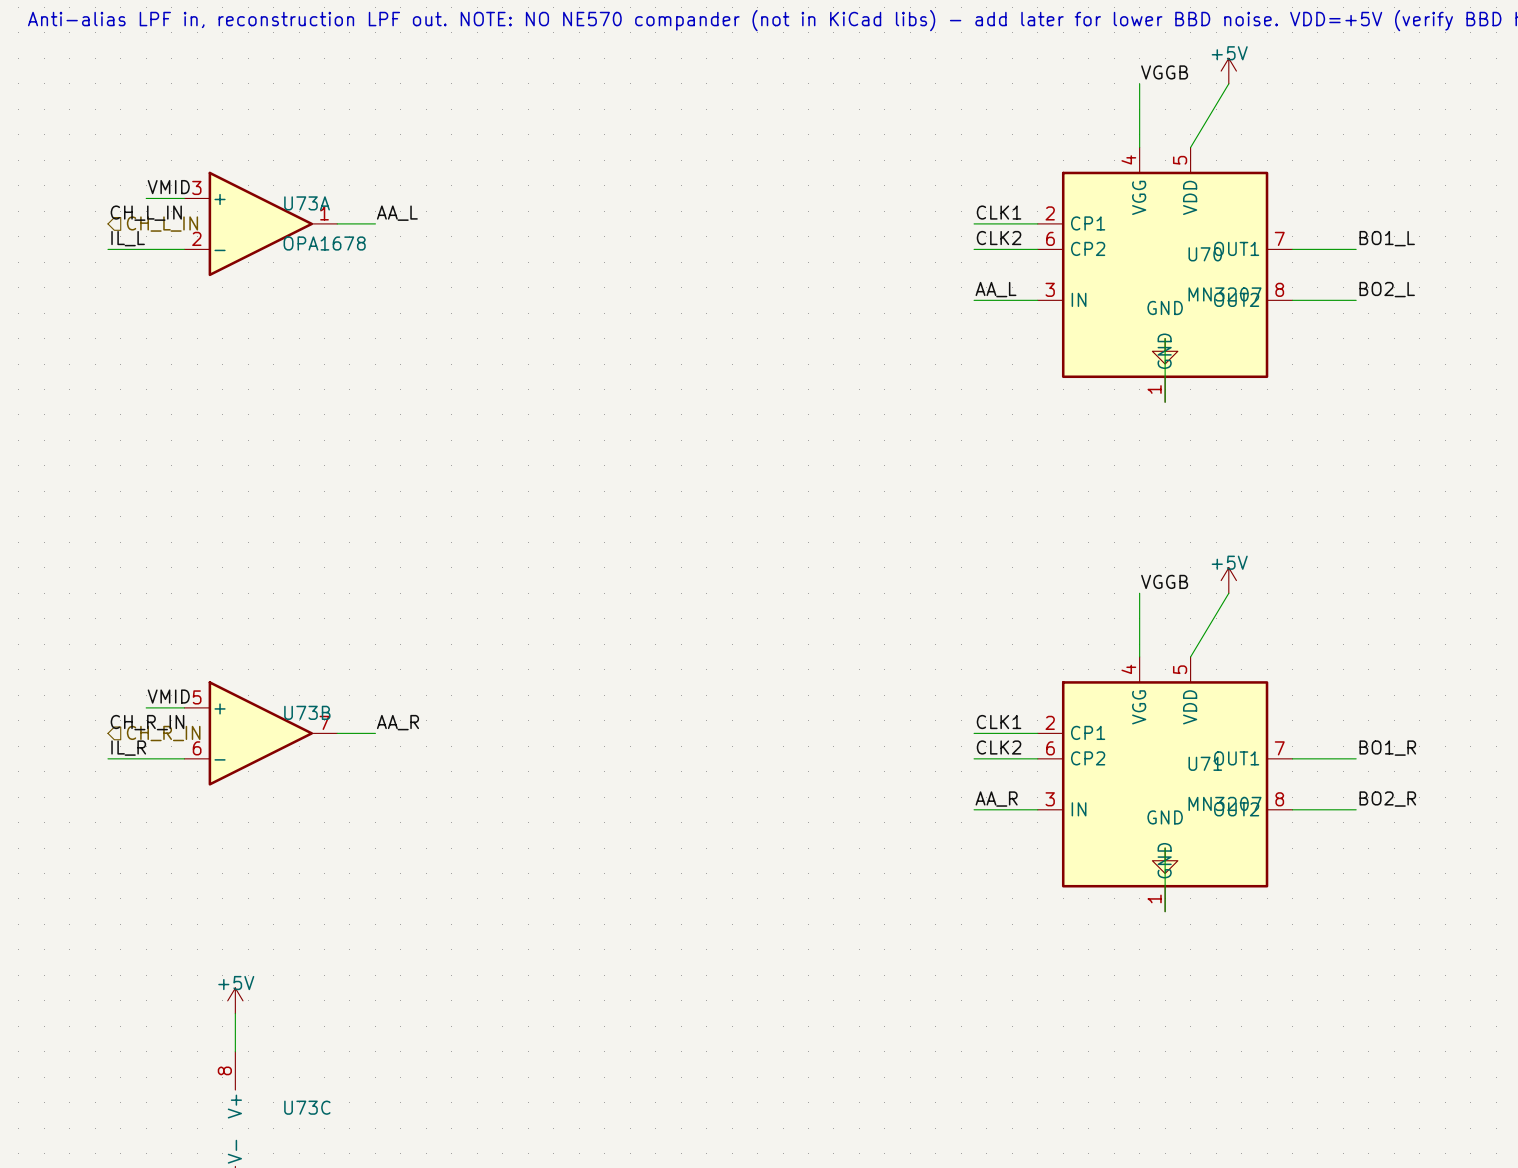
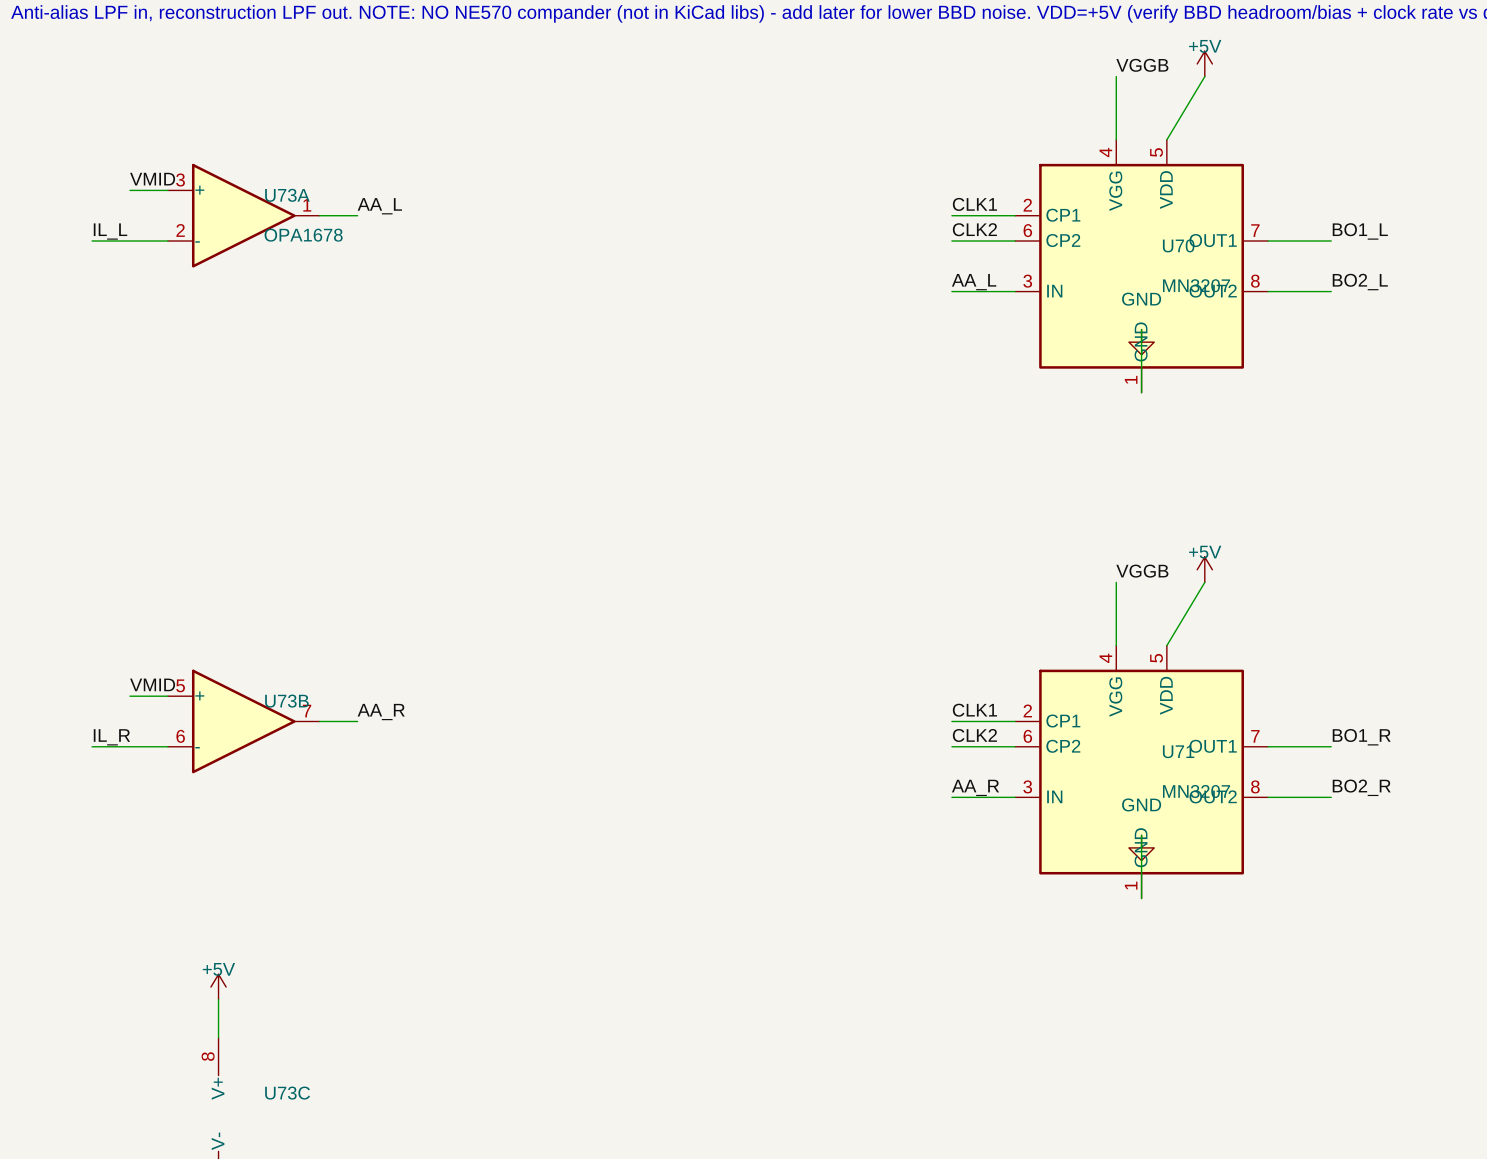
label: CH_L_IN (146, 213) -> none
hierarchical label: CH_L_IN (162, 224) -> none
label: CH_R_IN (147, 722) -> none
hierarchical label: CH_R_IN (163, 733) -> none

